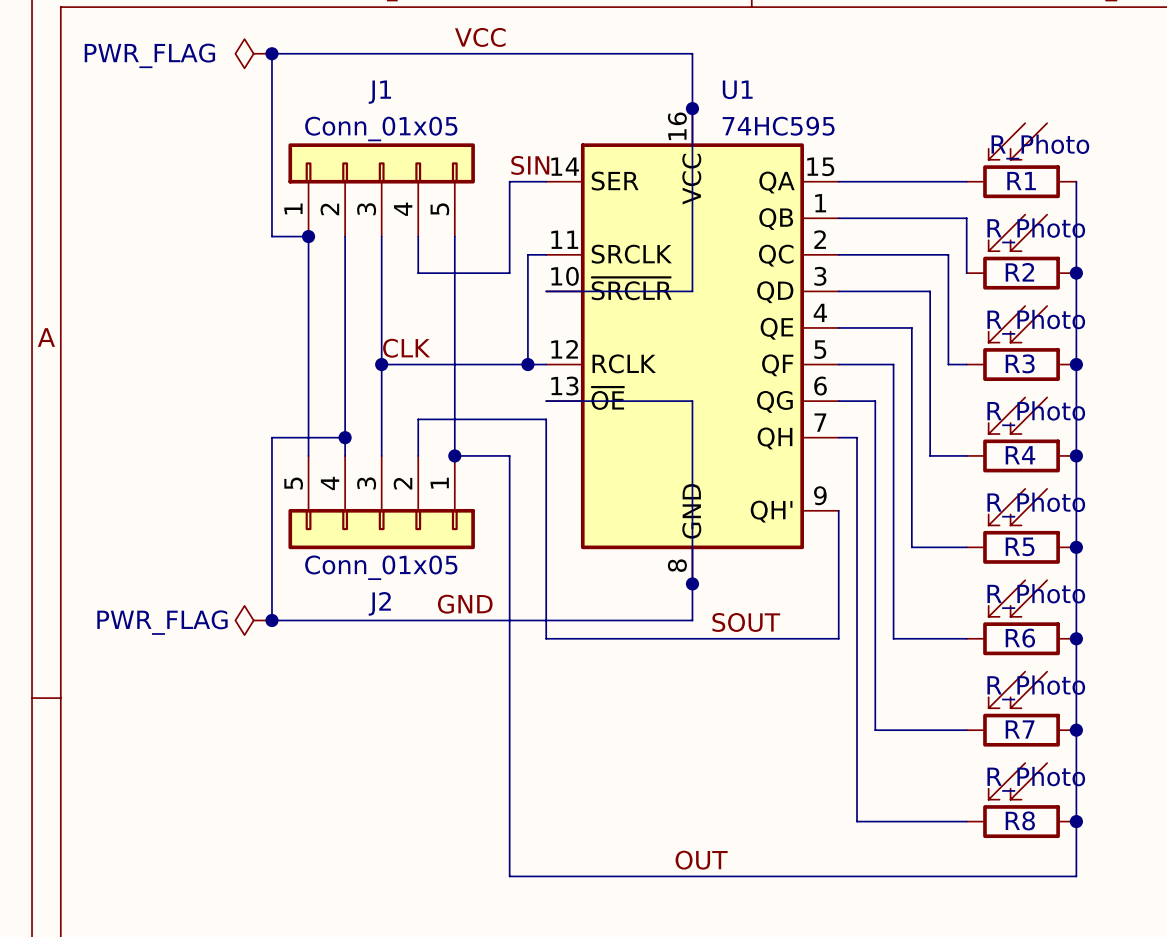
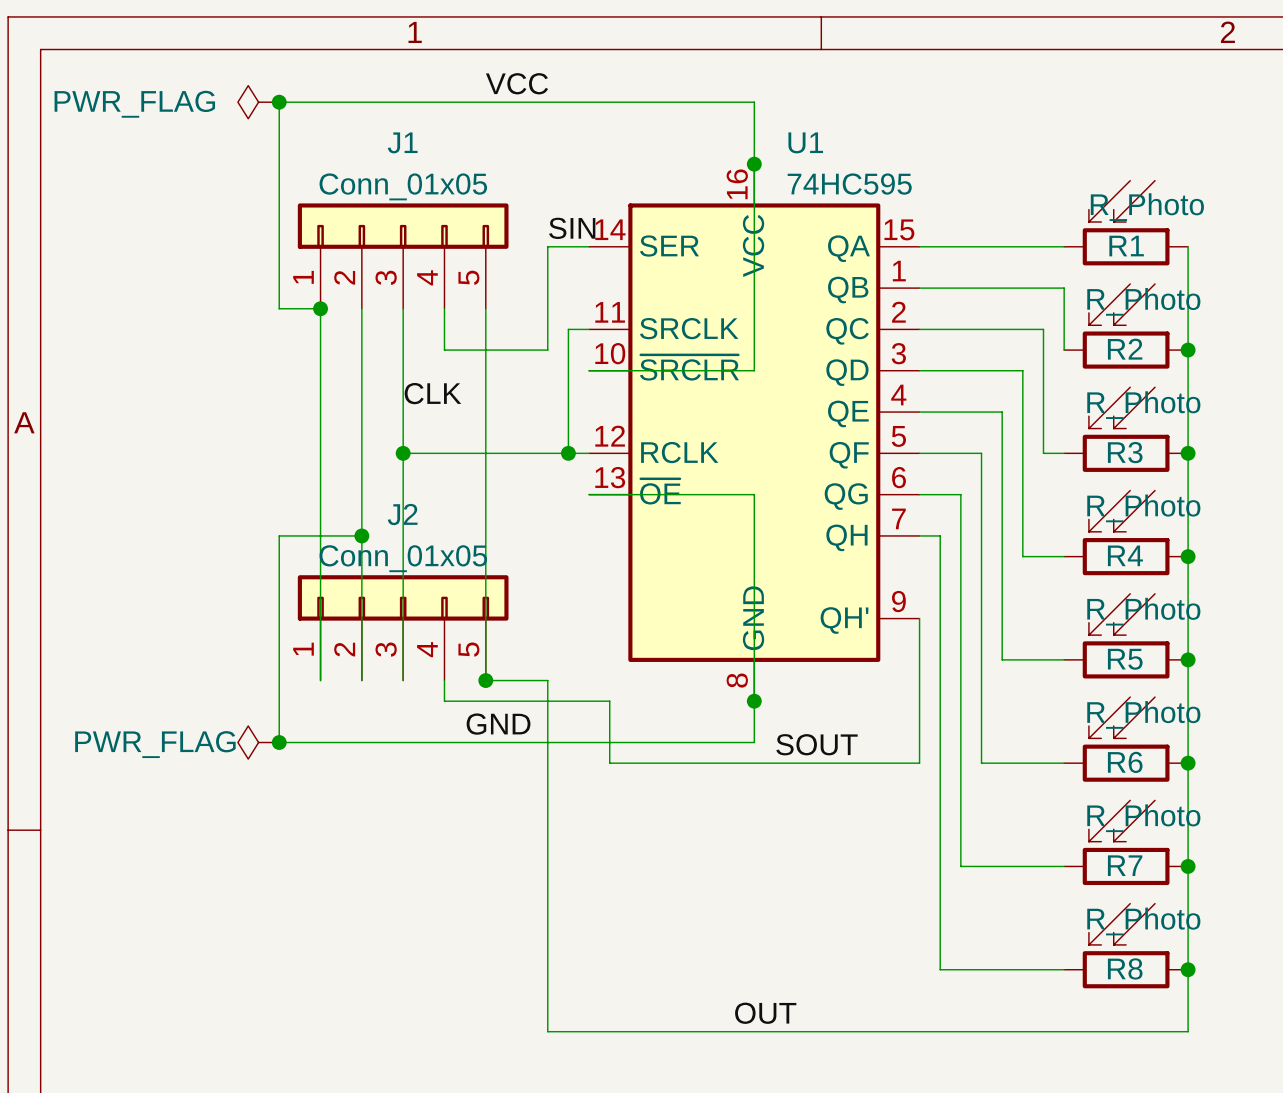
label position: CLK (406, 348) -> CLK (432, 393)
wire: (418, 455) (418, 419) (546, 419) (546, 638) (564, 638) -> (444, 680) (444, 701) (609, 701) (609, 763)
wire: (454, 455) (509, 455) (509, 565) -> (485, 556) (485, 680) (547, 680)
junction: (454, 455) -> none
J2 rotation: 0° (381, 529) -> 180° (403, 597)
junction: none -> (485, 680)

